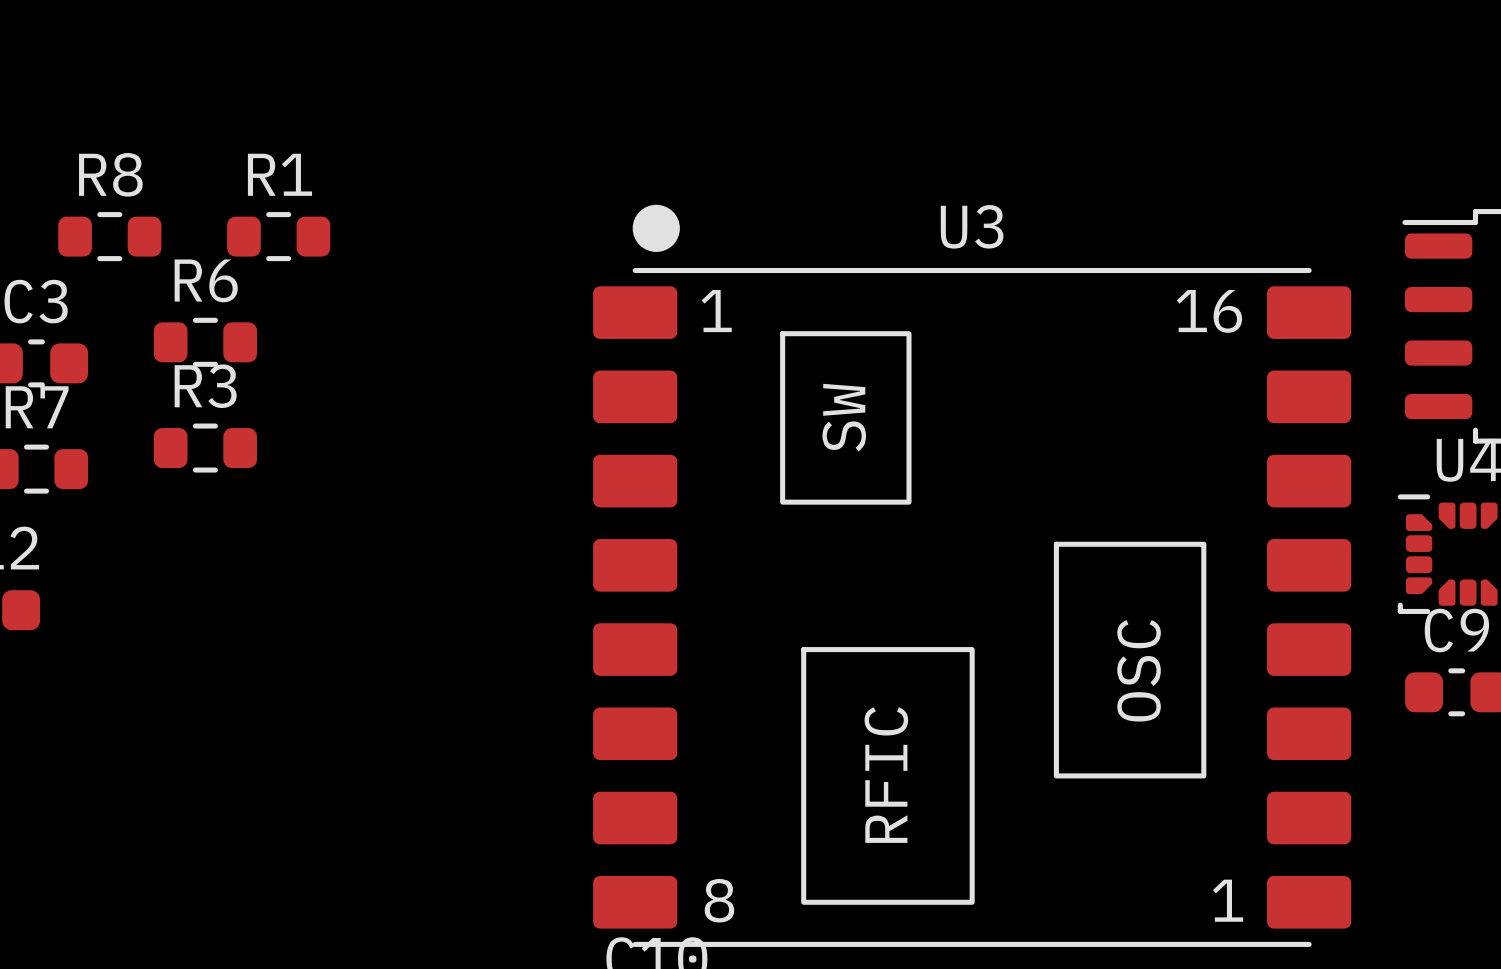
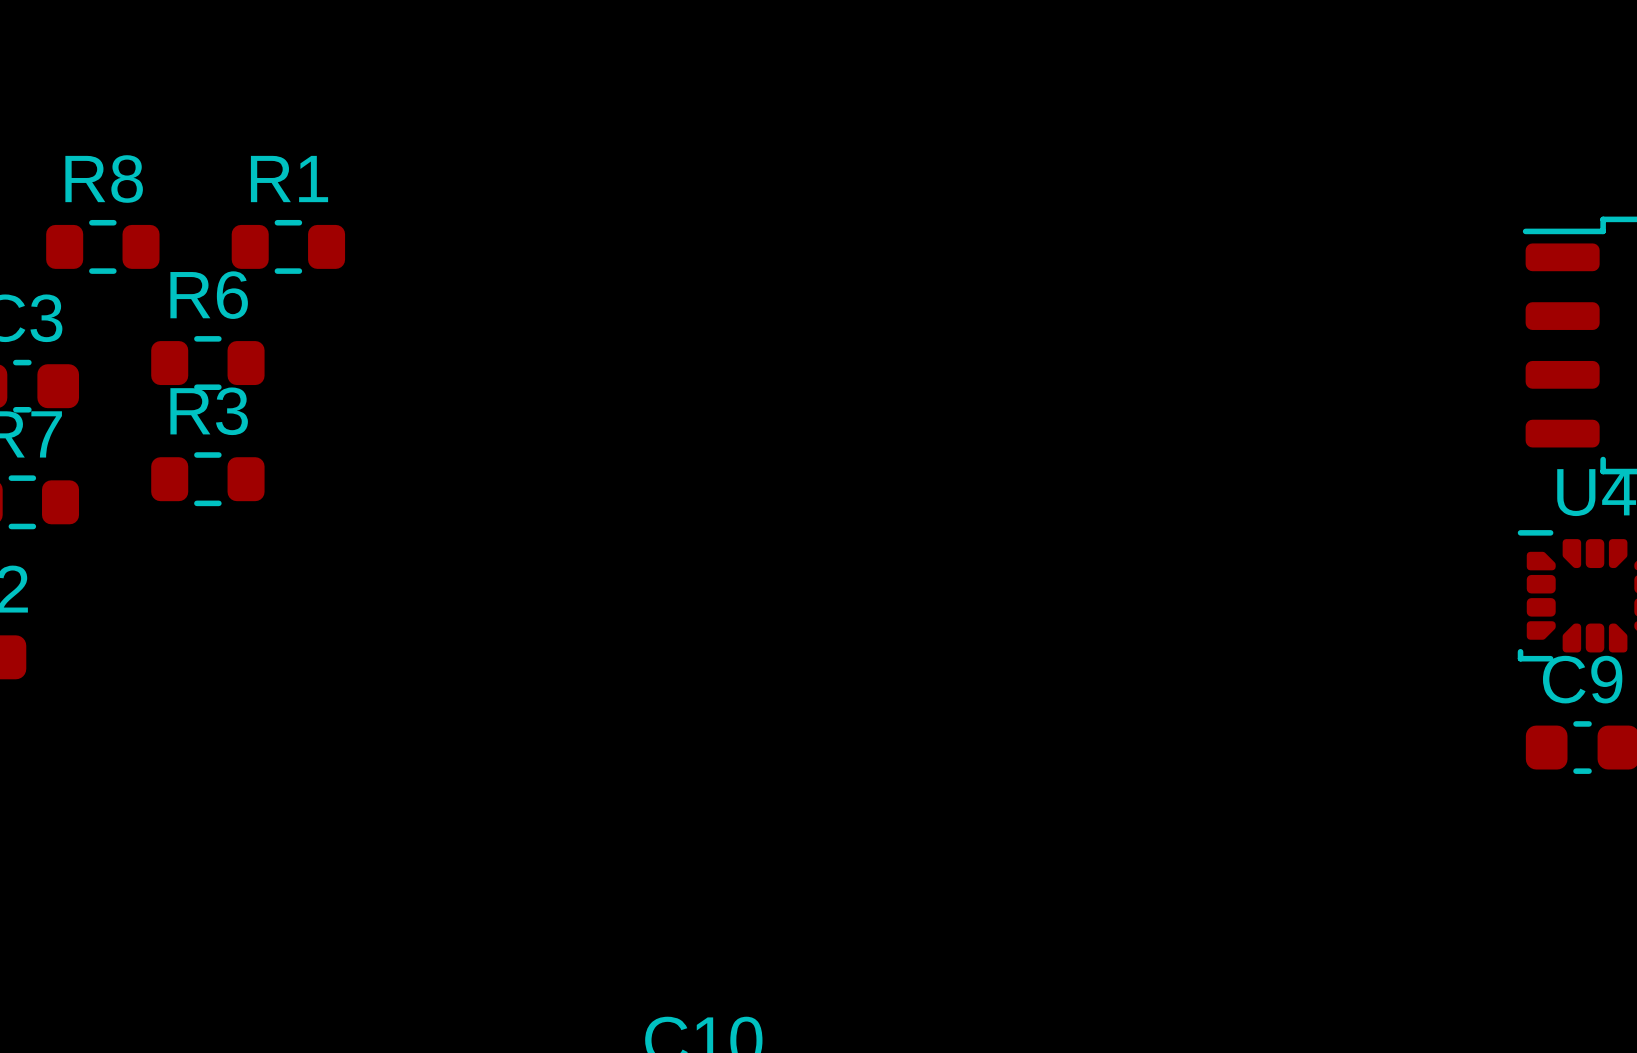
U3: (972, 575) -> none

